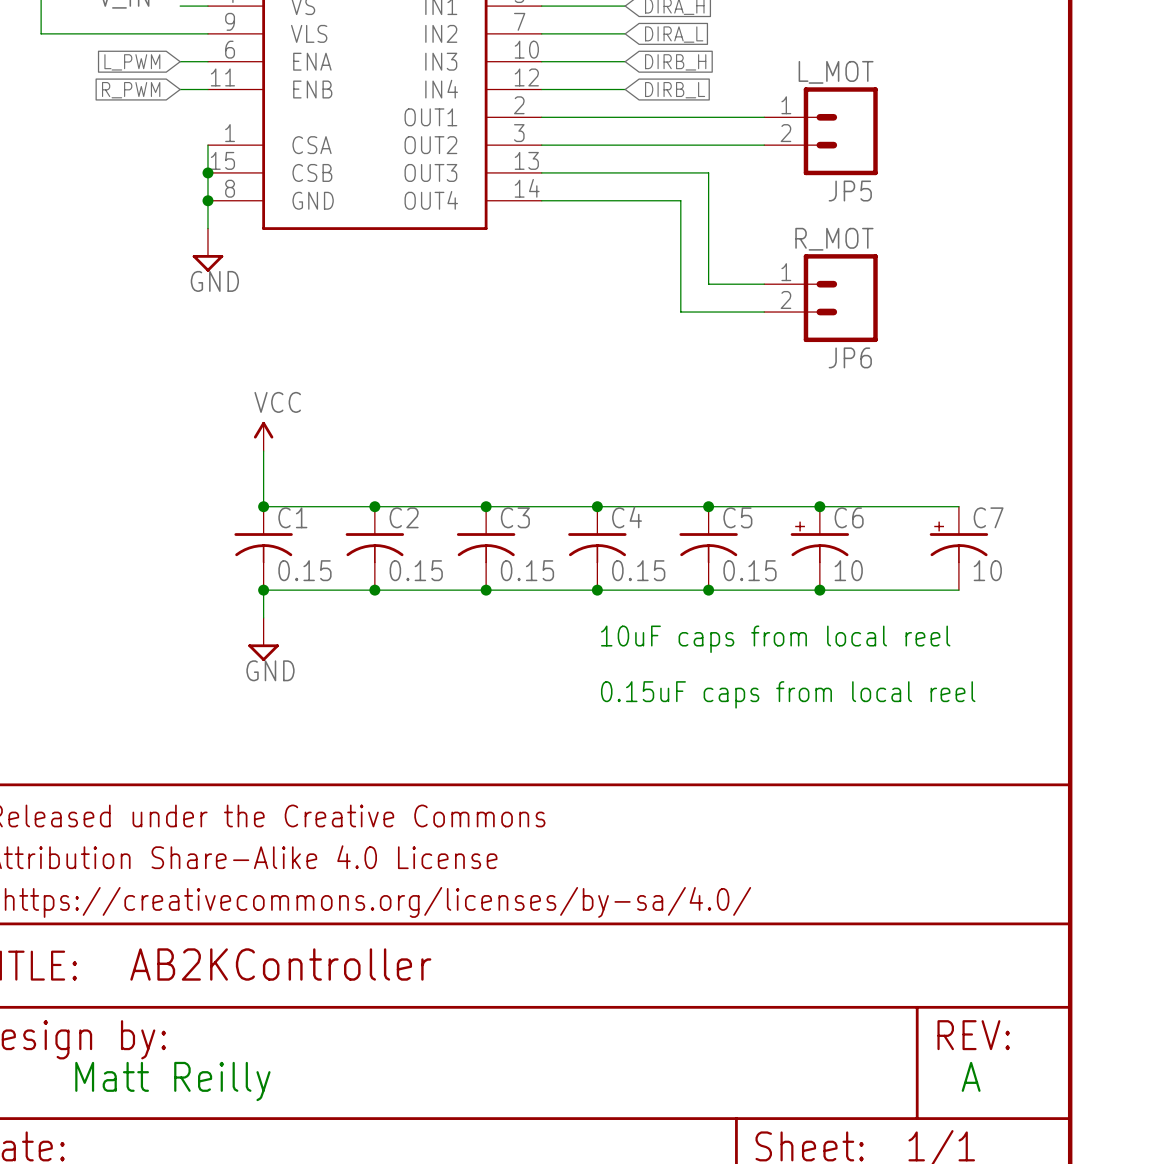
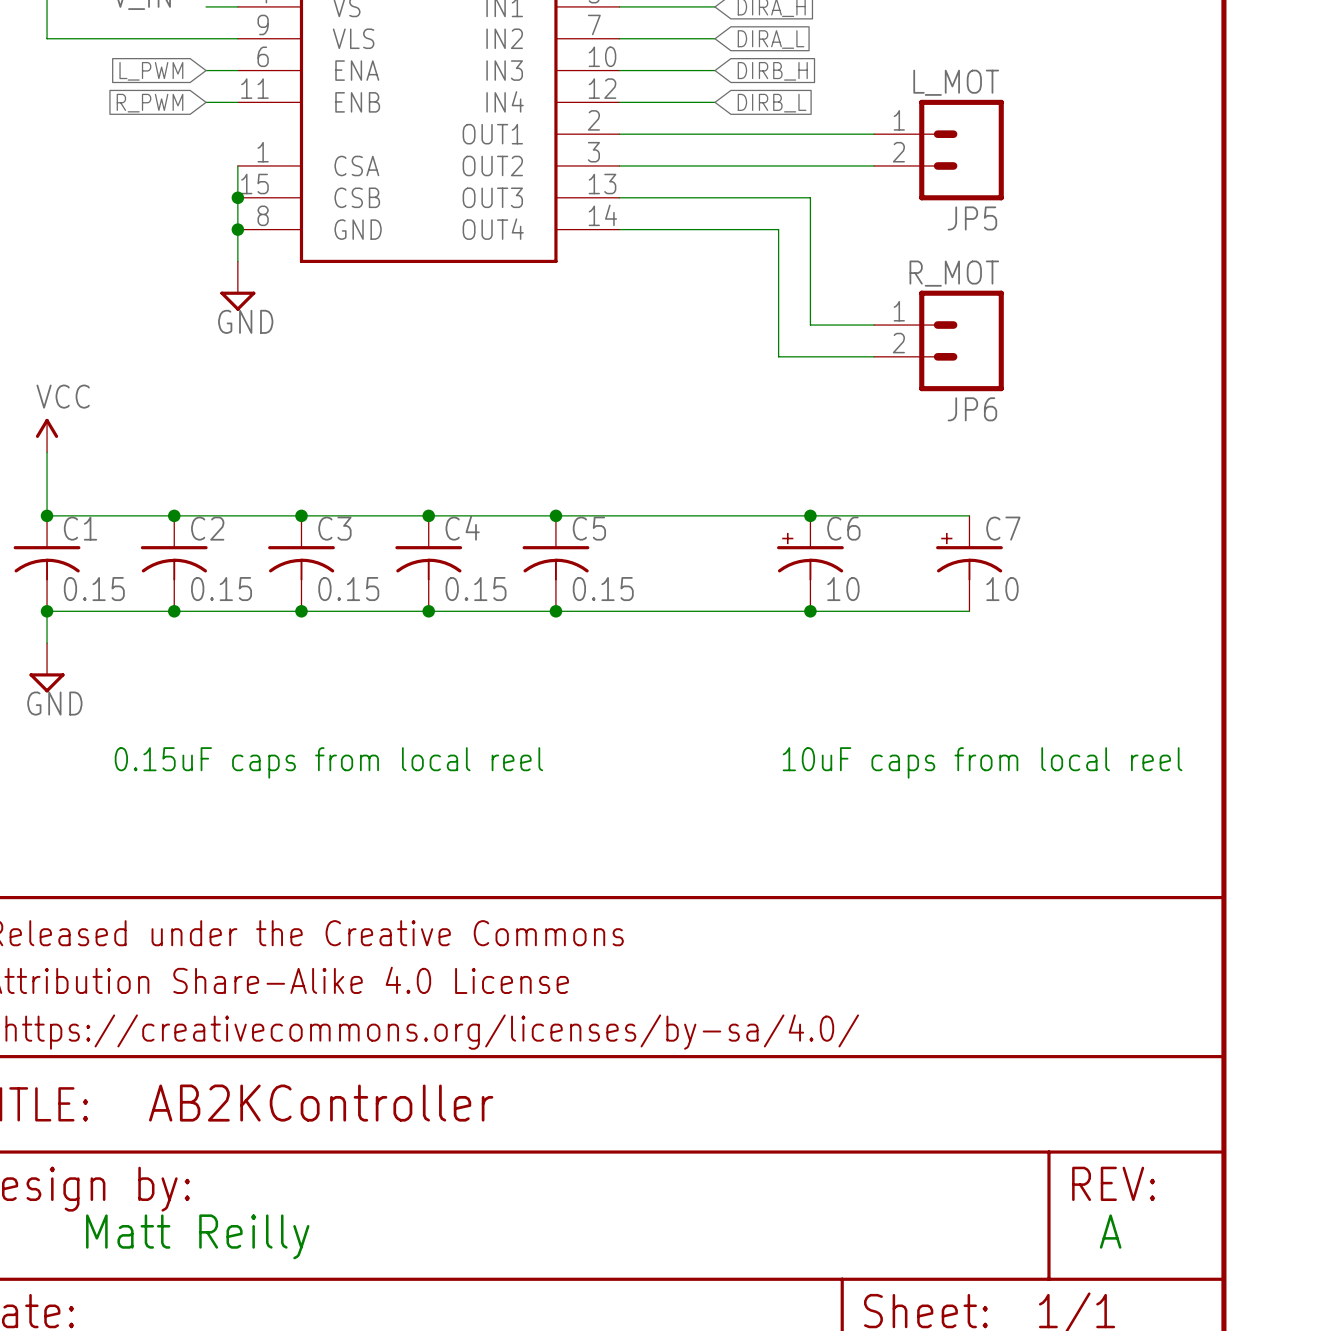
wire: none -> (47, 452) (47, 515) (969, 515)
power symbol position: VCC (263, 436) -> VCC (47, 435)
junction: none -> (47, 515)
junction: none -> (174, 515)
wire: (263, 451) (263, 506) (958, 506) -> none
junction: none -> (301, 515)
junction: none -> (428, 515)
junction: none -> (555, 515)
junction: none -> (810, 515)
junction: (263, 506) -> none
junction: (374, 506) -> none
junction: (486, 506) -> none
junction: (597, 506) -> none
junction: (708, 506) -> none
junction: (819, 506) -> none
junction: none -> (47, 611)
junction: none -> (174, 611)
junction: none -> (301, 611)
junction: none -> (428, 611)
junction: none -> (555, 611)
junction: none -> (810, 611)
wire: none -> (969, 611) (47, 611) (47, 643)
C1 position: (263, 548) -> (47, 563)
C2 position: (374, 548) -> (174, 563)
C3 position: (486, 548) -> (301, 563)
C4 position: (597, 548) -> (428, 563)
C5 position: (708, 548) -> (555, 563)
C6 position: (819, 548) -> (810, 563)
C7 position: (958, 548) -> (969, 563)
junction: (263, 590) -> none
junction: (374, 590) -> none
junction: (486, 590) -> none
junction: (597, 590) -> none
junction: (708, 590) -> none
junction: (819, 590) -> none
wire: (958, 590) (263, 590) (263, 617) -> none
power symbol position: GND (263, 639) -> GND (47, 667)
text position: 10uF caps from local reel (775, 639) -> 10uF caps from local reel (982, 762)
text: none -> 0.15uF caps from local reel (328, 762)
text: 0.15uF caps from local reel (788, 694) -> none

